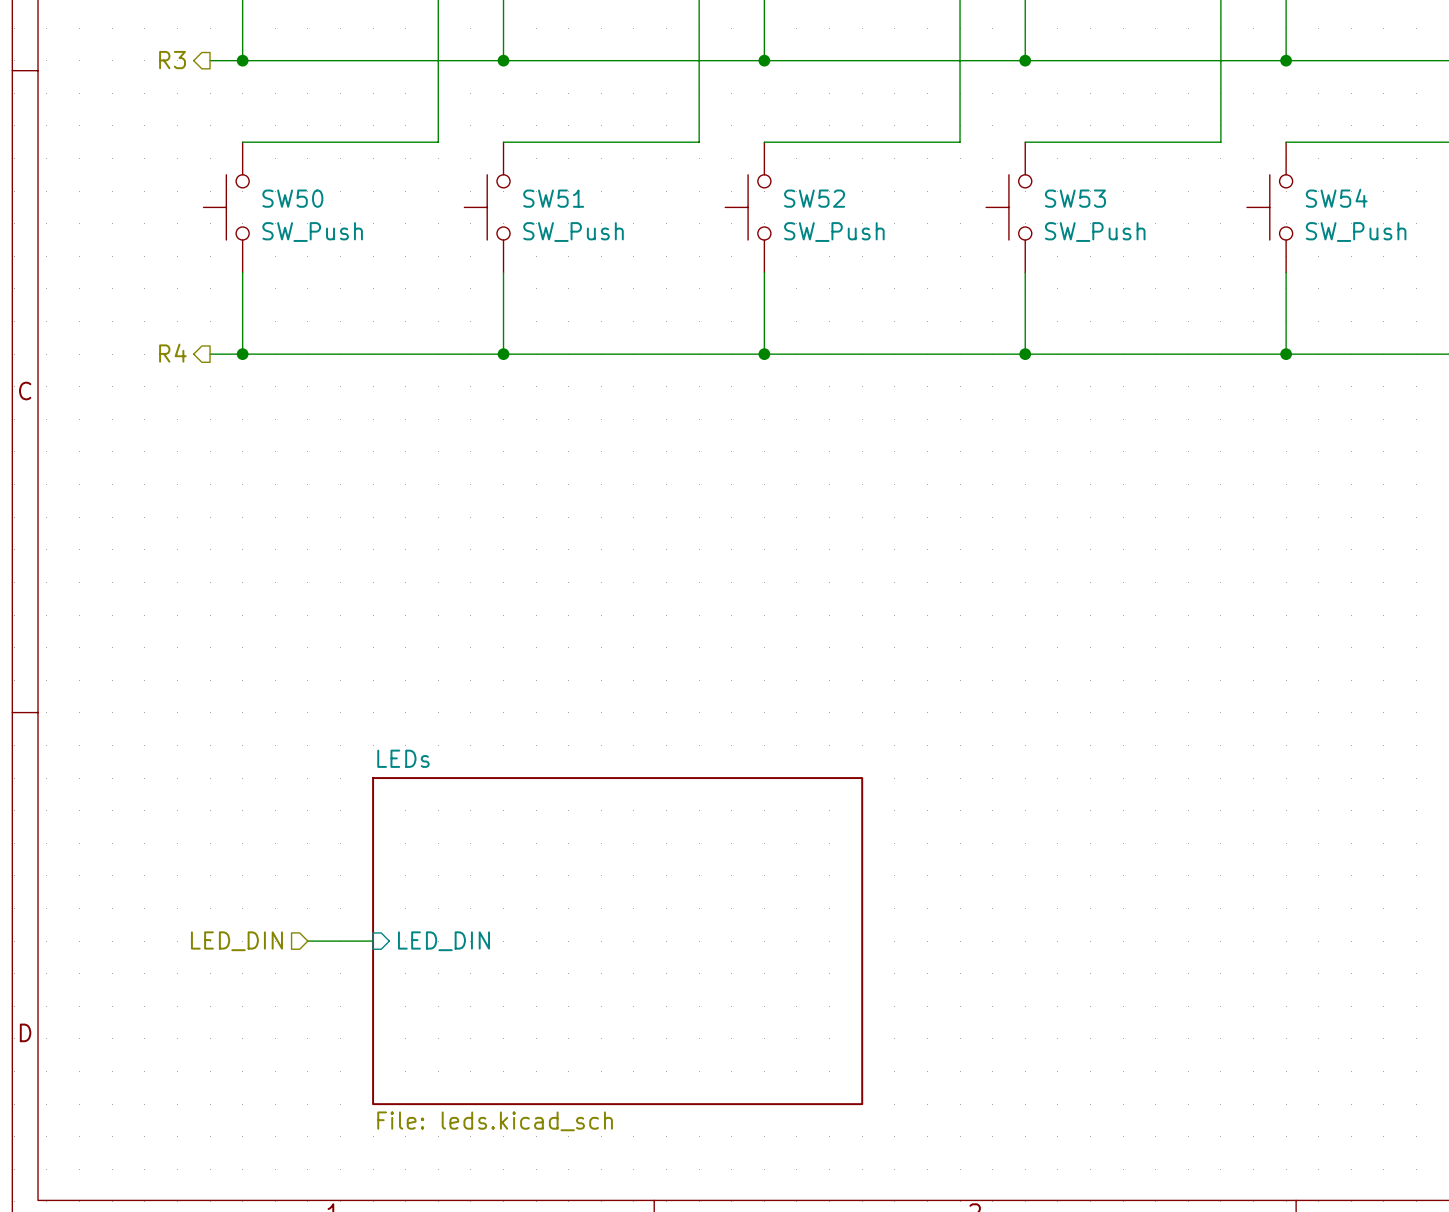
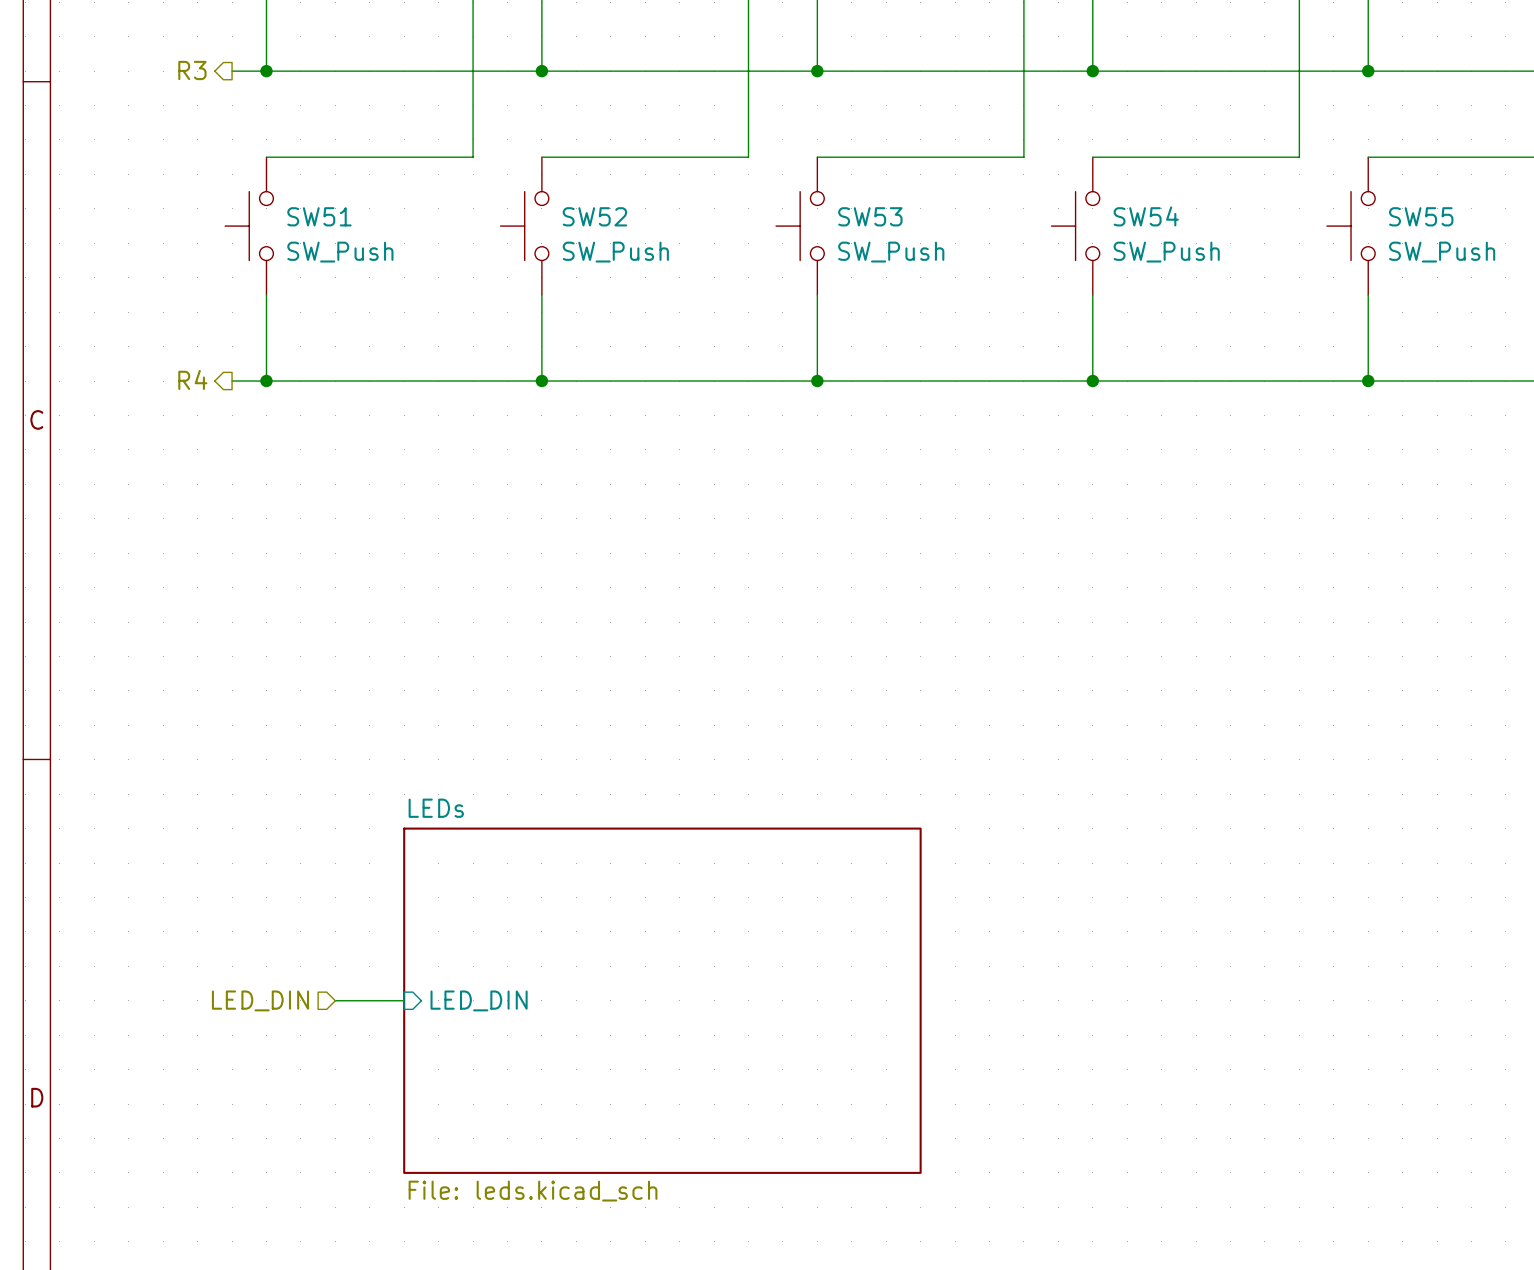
SW50 name: SW50 (292, 198) -> SW51 (319, 216)
SW51 name: SW51 (553, 198) -> SW52 (594, 216)
SW52 name: SW52 (814, 198) -> SW53 (870, 216)
SW53 name: SW53 (1075, 198) -> SW54 (1146, 216)
SW54 name: SW54 (1336, 198) -> SW55 (1421, 216)

